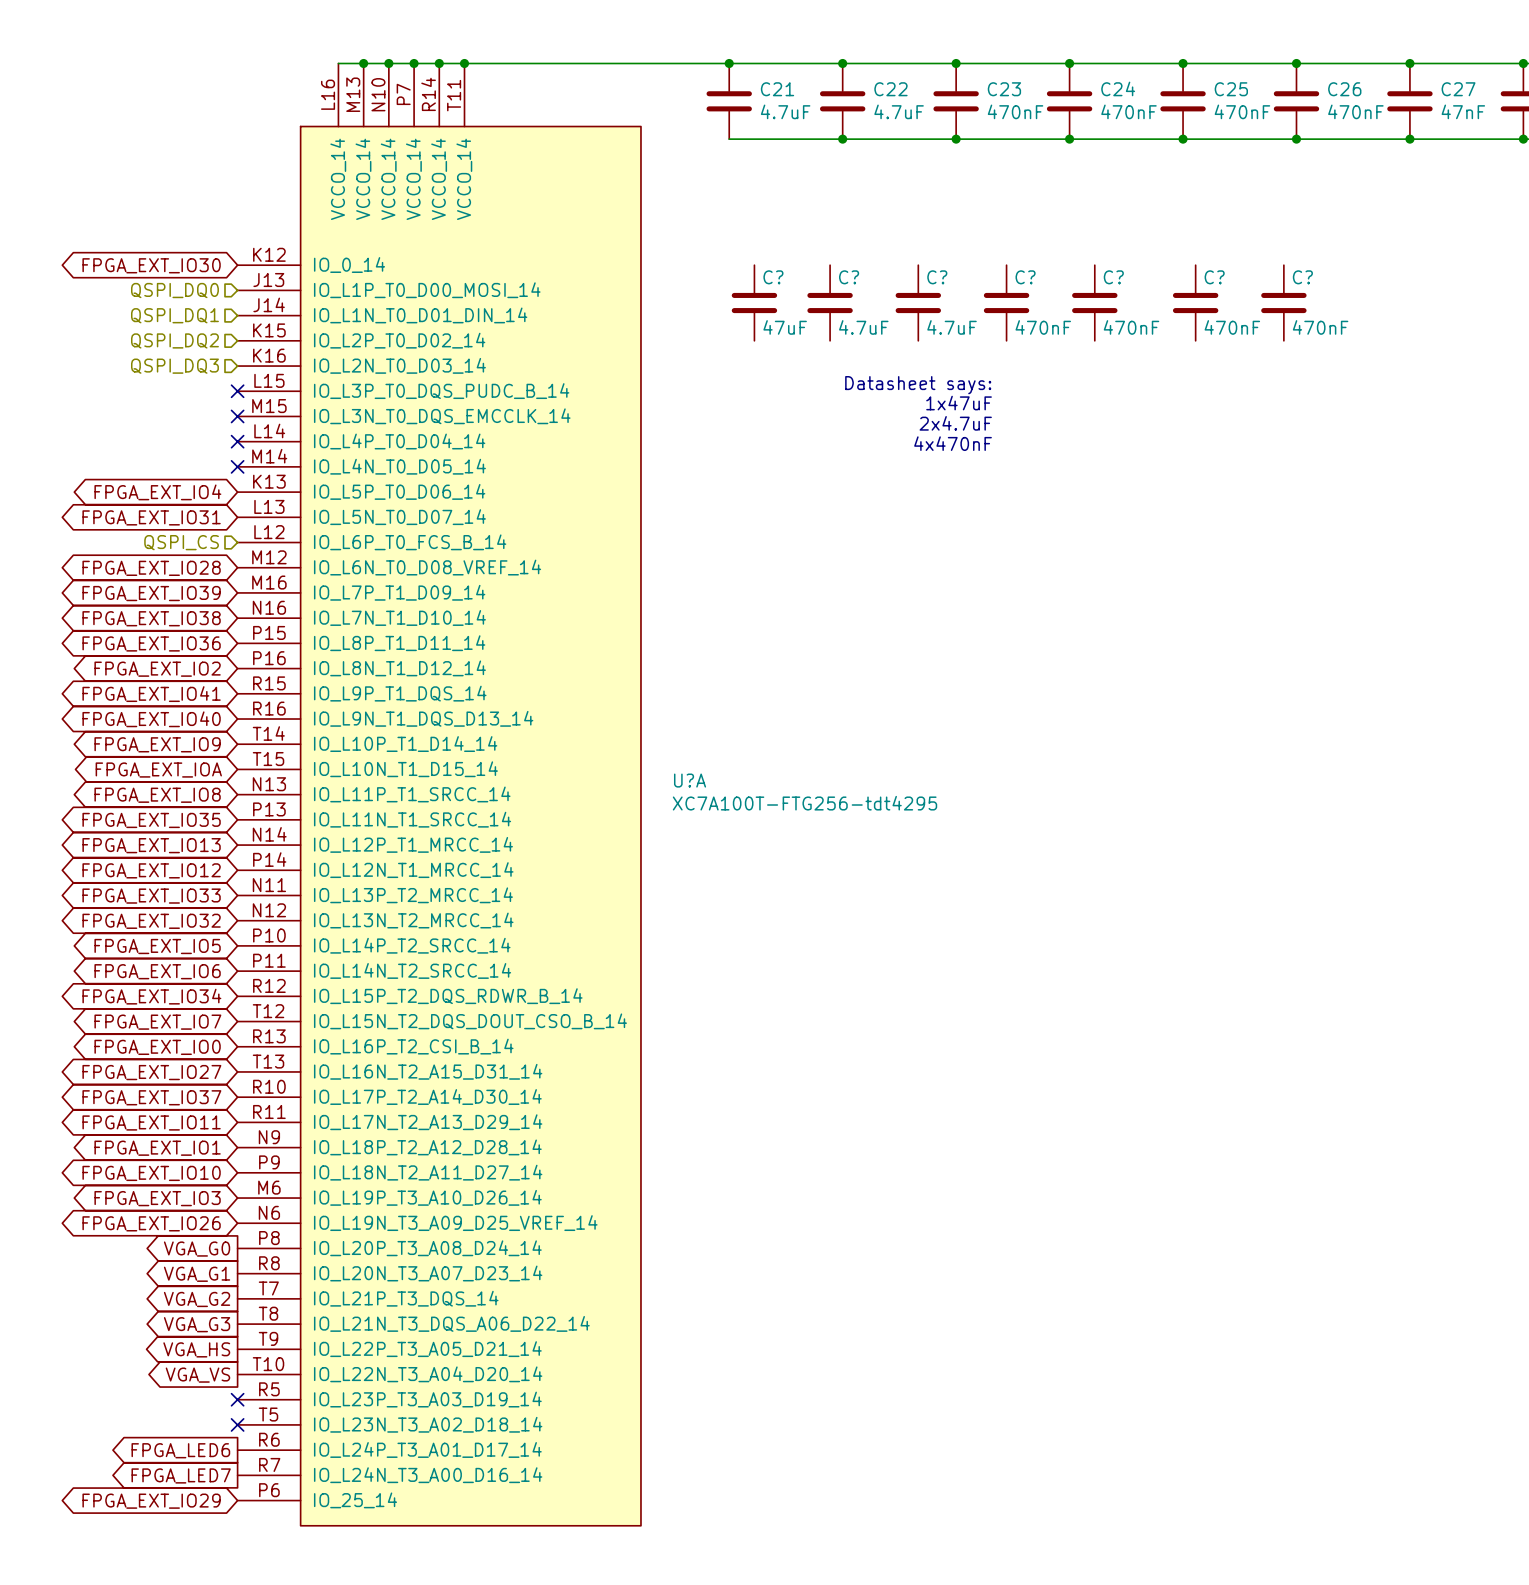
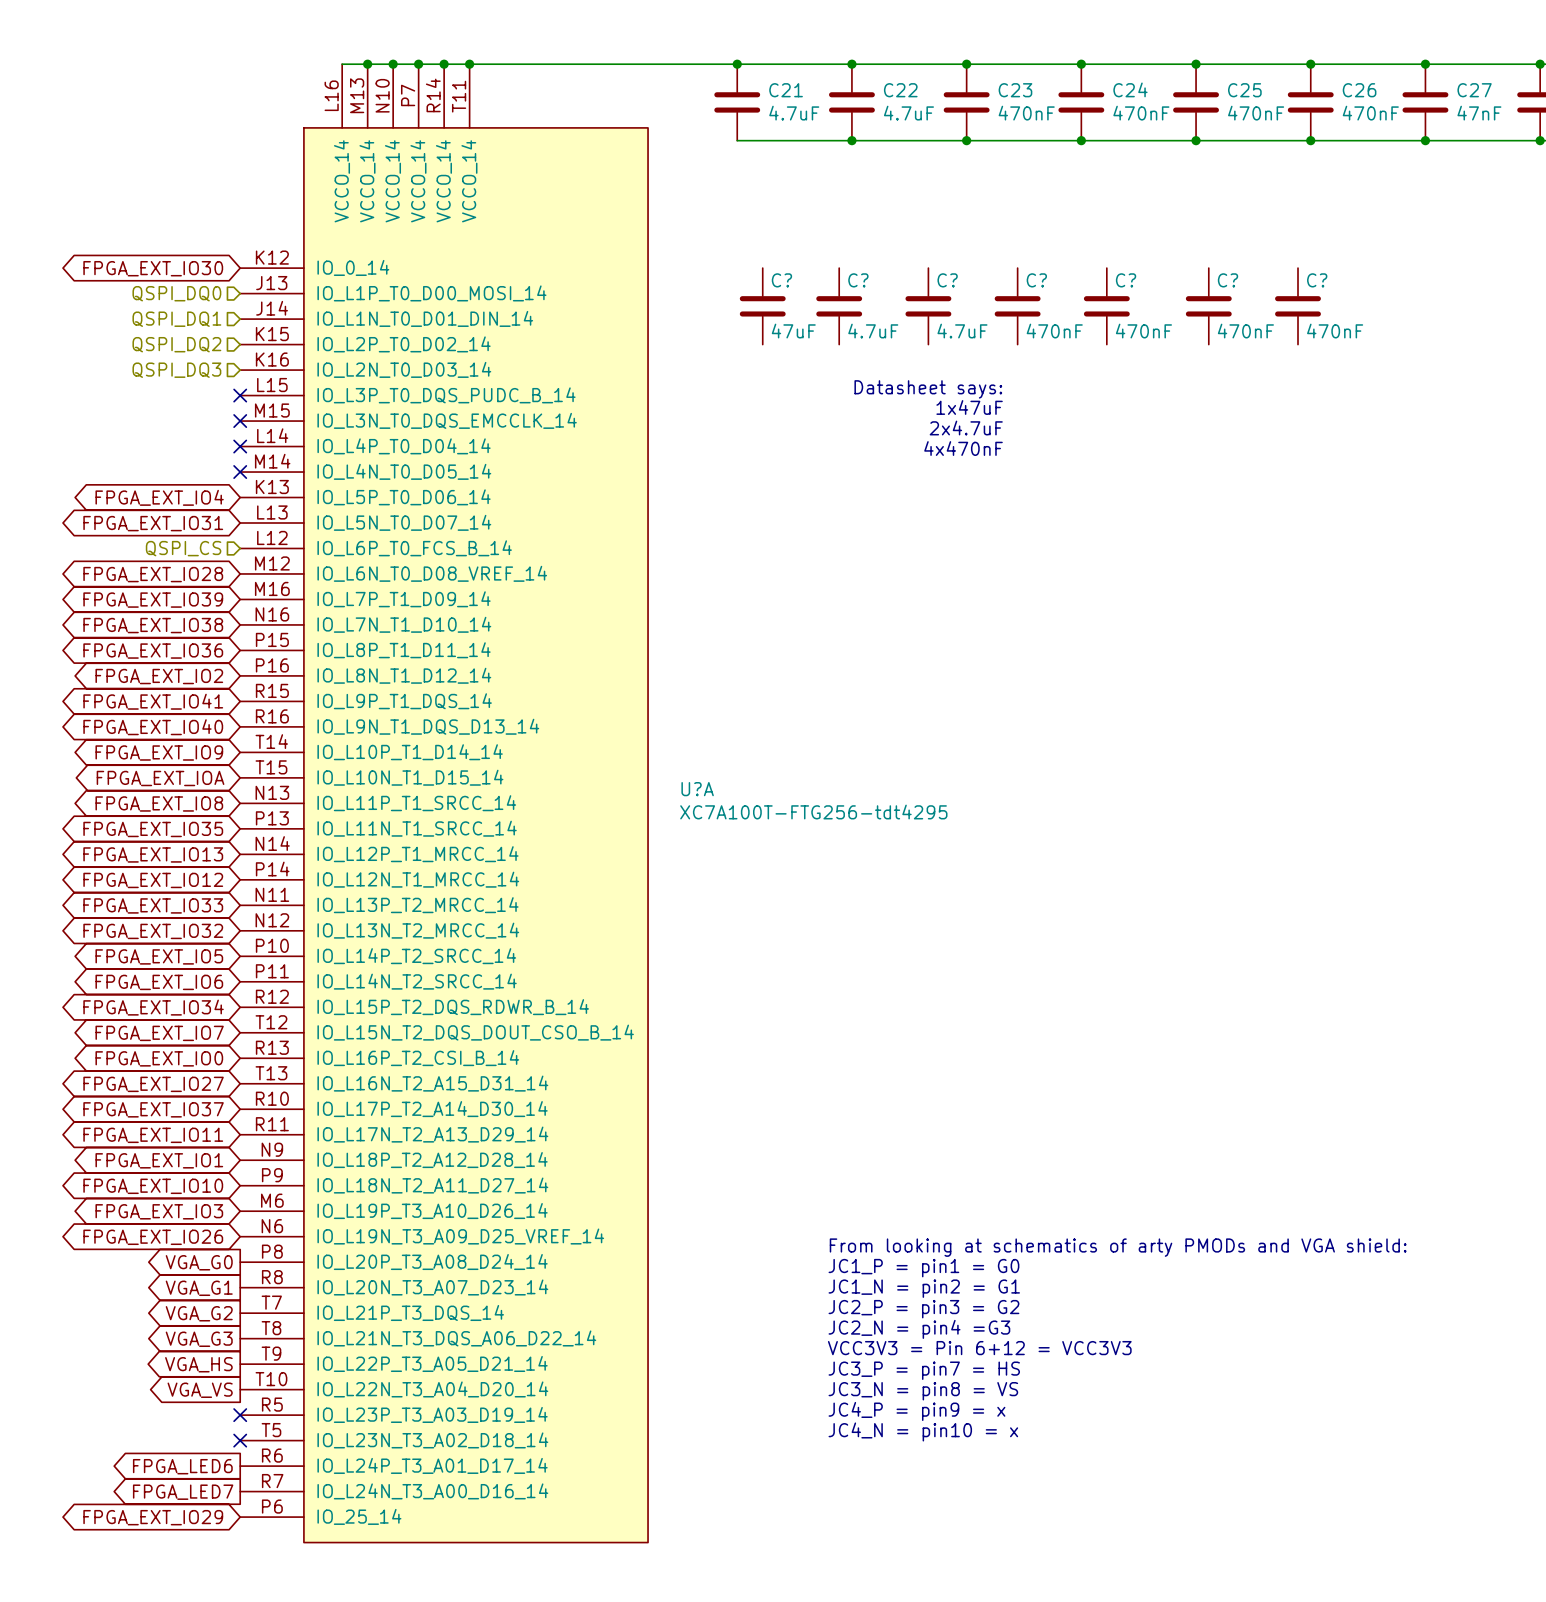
text: none -> From looking at schematics of arty PMODs and VGA shield: (1118, 1247)
text: none -> JC1_P = pin1 = G0 (923, 1268)
text: none -> JC1_N = pin2 = G1 (924, 1288)
text: none -> JC2_P = pin3 = G2 (923, 1309)
text: none -> JC2_N = pin4 =G3 (919, 1329)
text: none -> VCC3V3 = Pin 6+12 = VCC3V3 (979, 1348)
text: none -> JC3_P = pin7 = HS (924, 1370)
text: none -> JC3_N = pin8 = VS (923, 1391)
text: none -> JC4_P = pin9 = x (916, 1411)
text: none -> JC4_N = pin10 = x (923, 1431)

